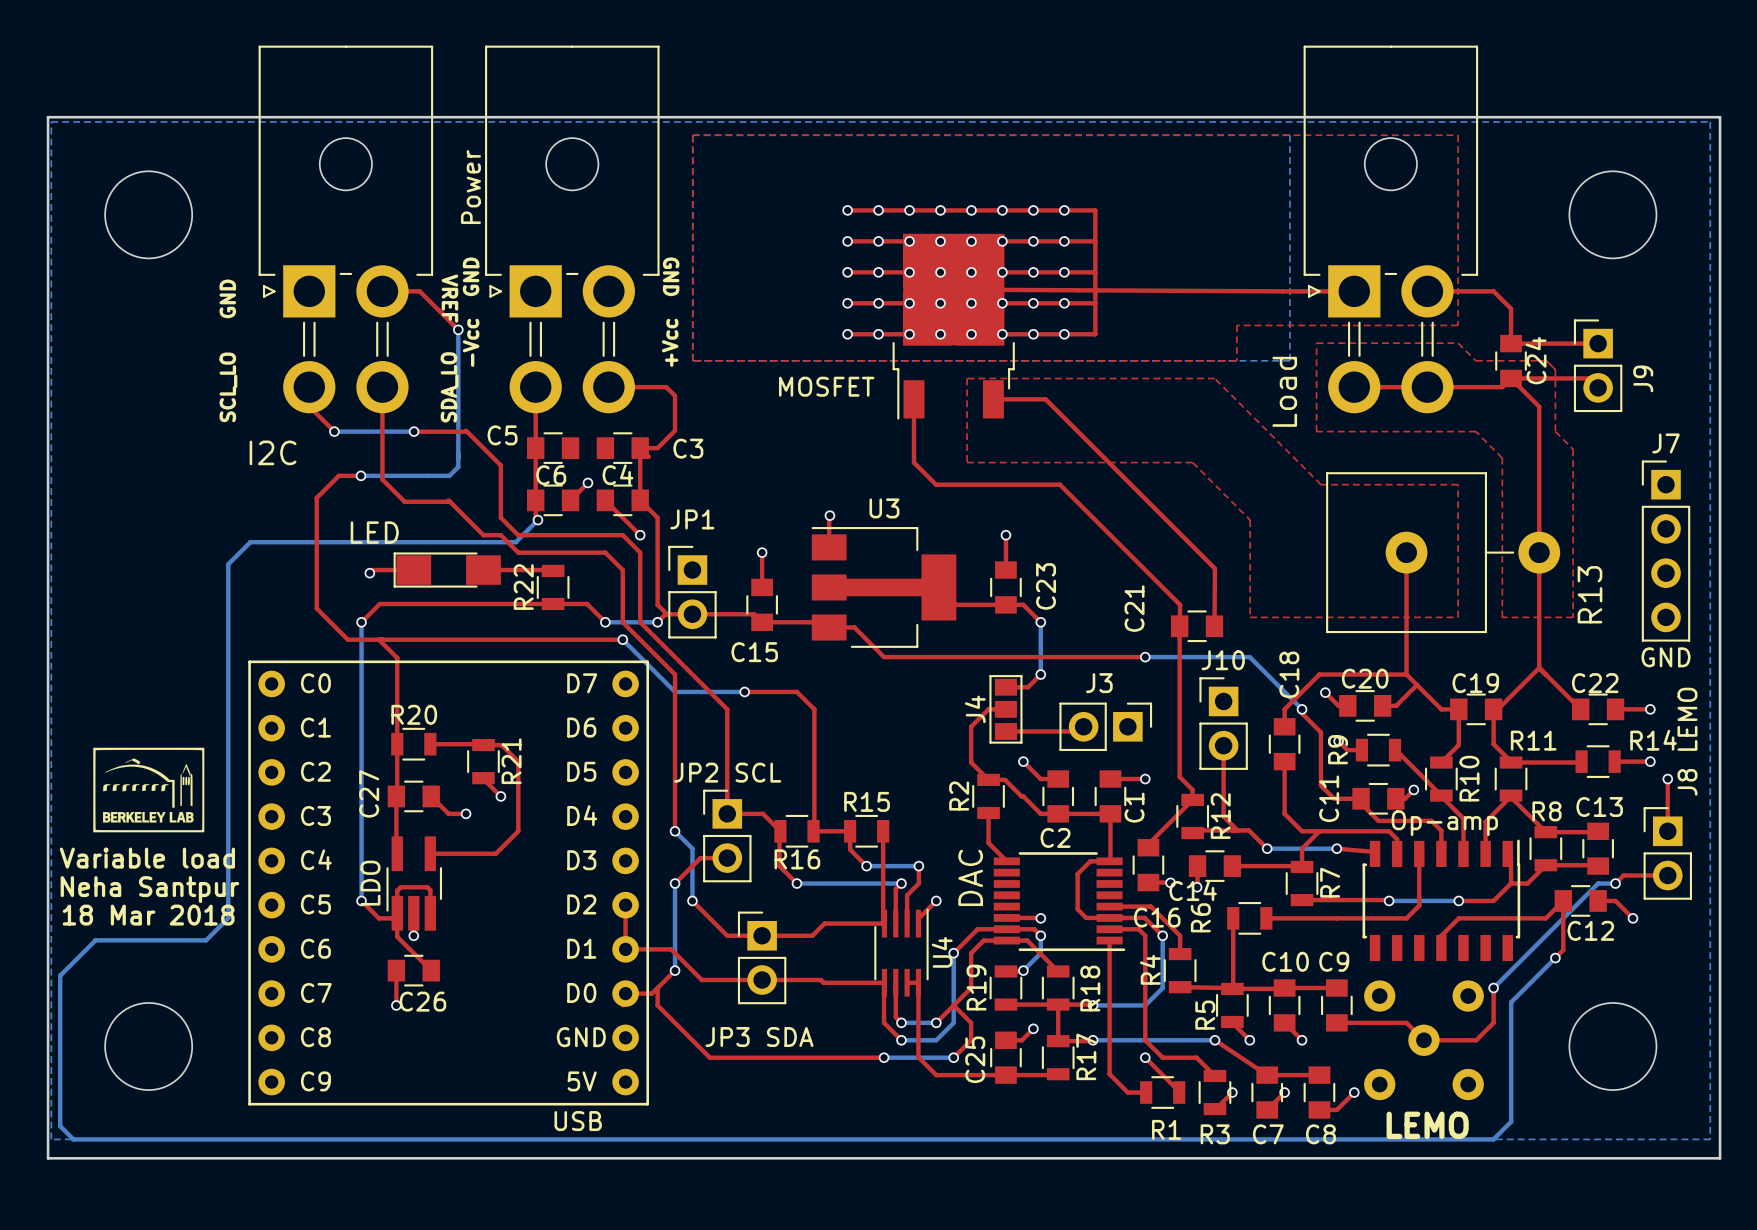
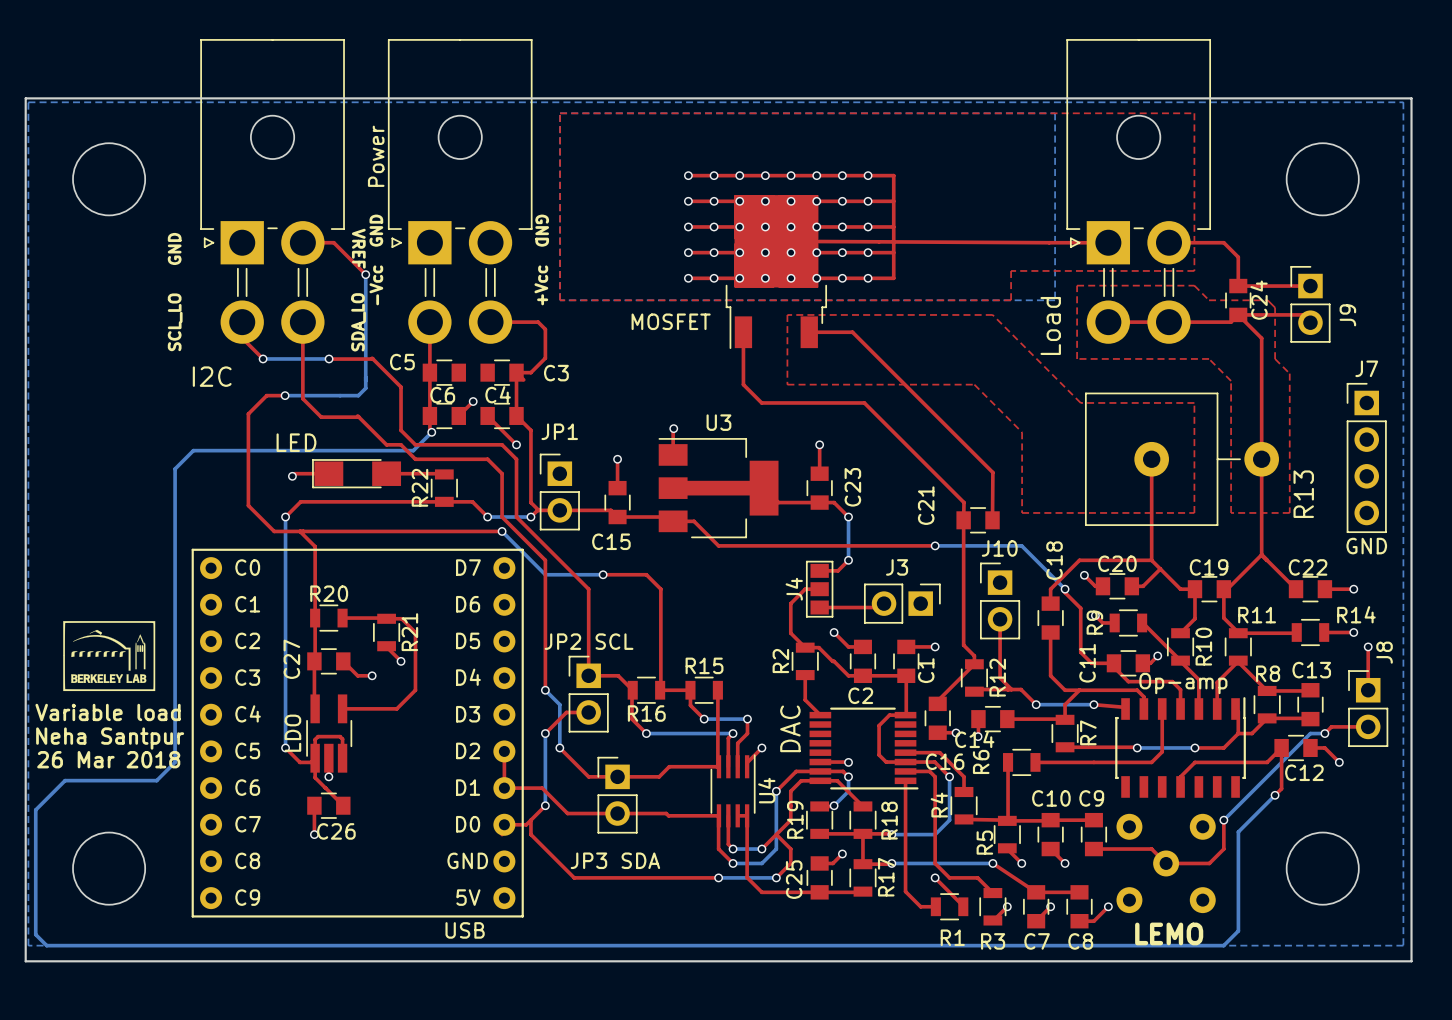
J8 LEMO name: J8 LEMO (1687, 741) -> J8 (1384, 652)
text: 18 Mar 2018 (148, 915) -> 26 Mar 2018 (108, 759)

